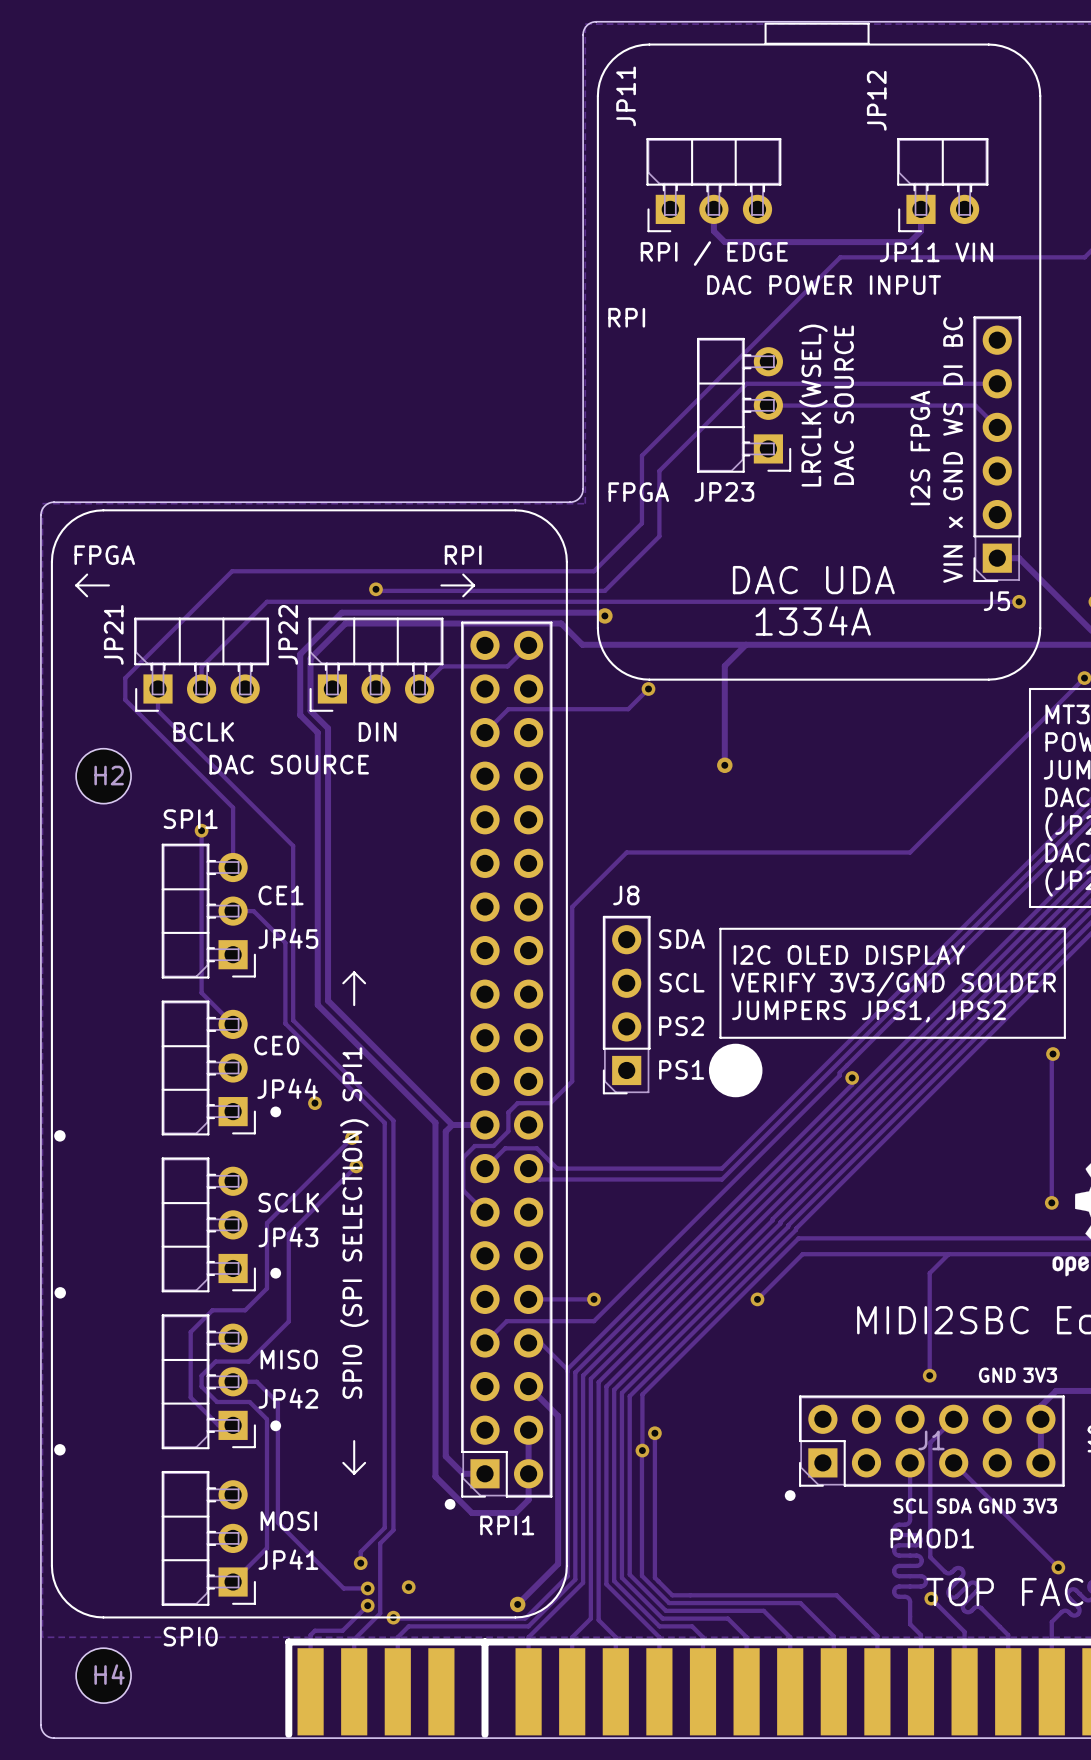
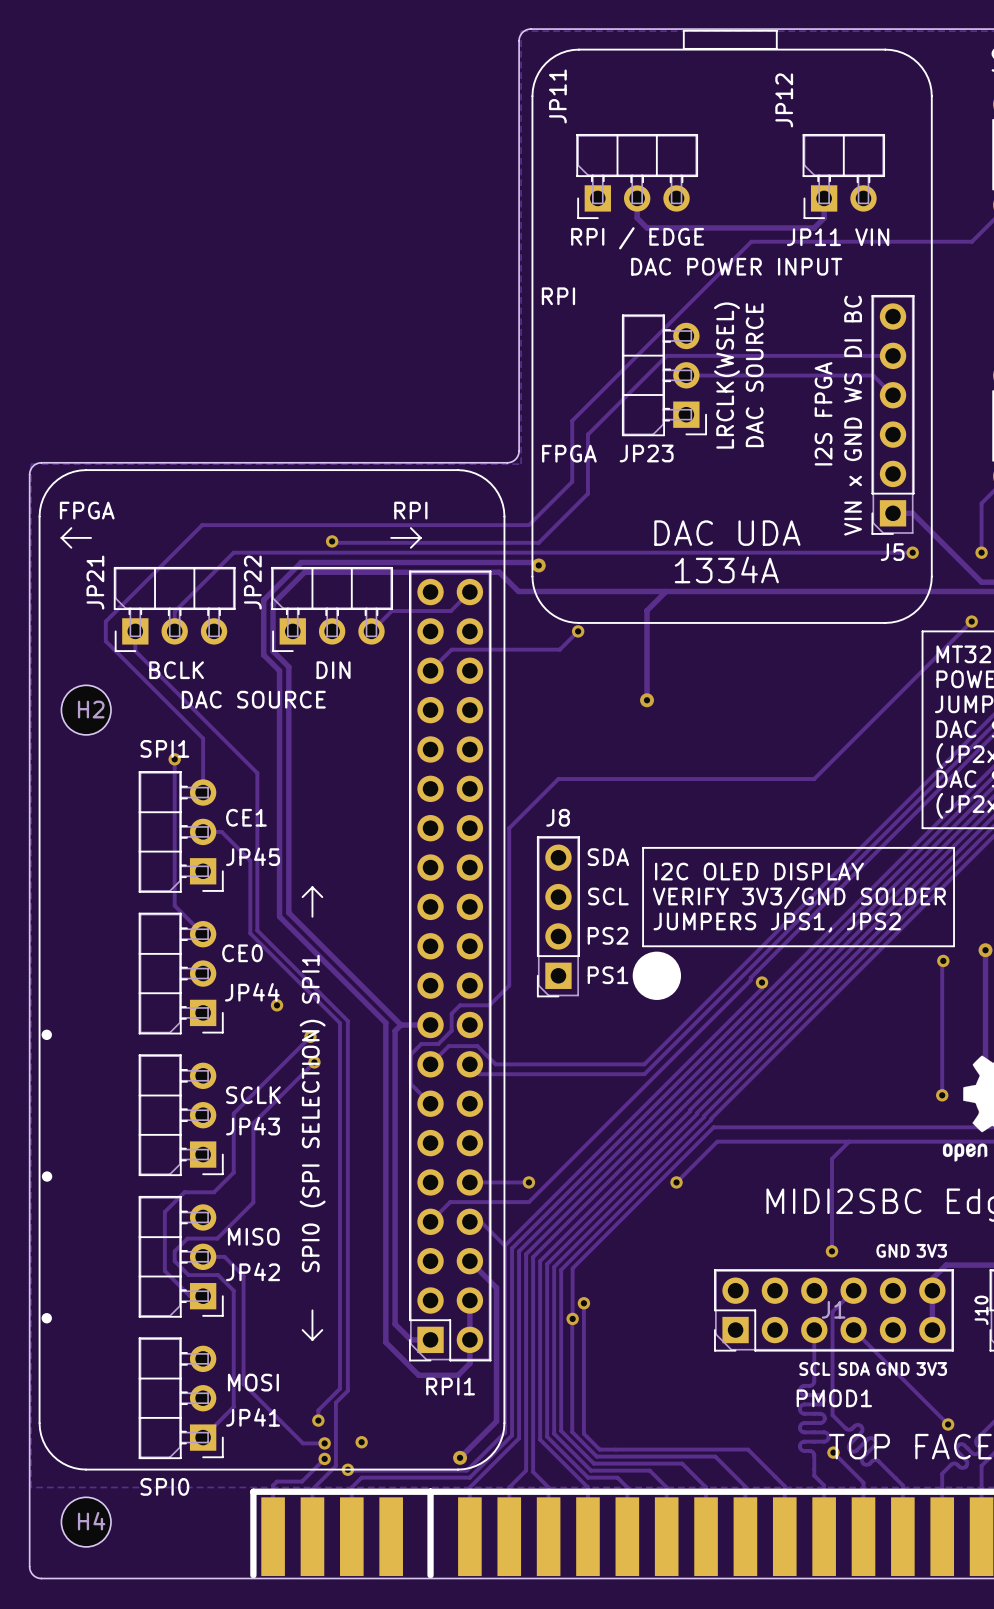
drawing: [270, 1106, 282, 1118] -> none
drawing: [270, 1267, 282, 1279] -> none
drawing: [270, 1420, 282, 1432] -> none
drawing: [784, 1490, 796, 1501] -> none
drawing: [444, 1498, 456, 1510] -> none

